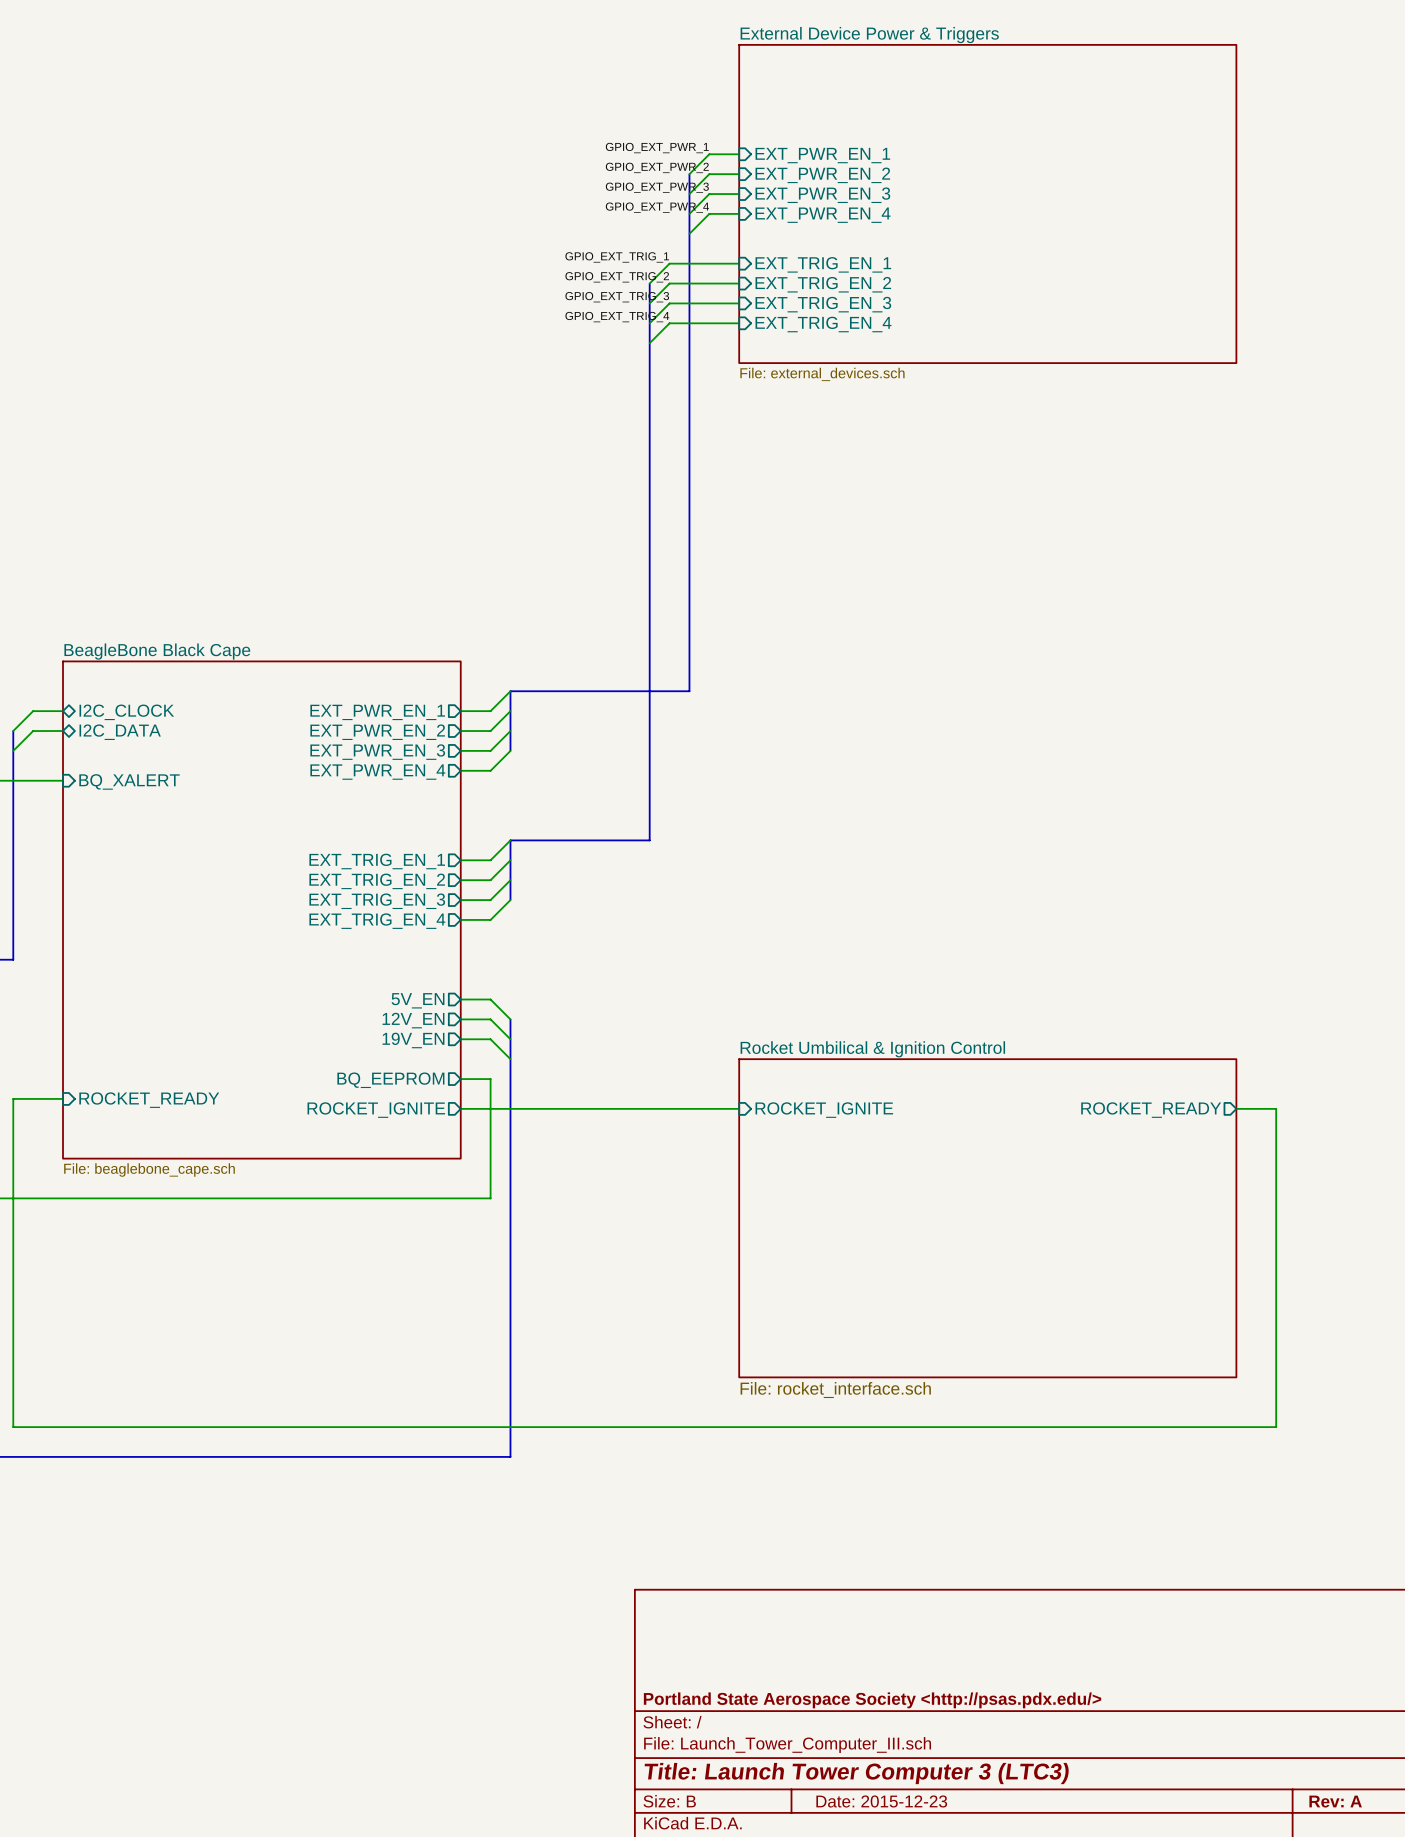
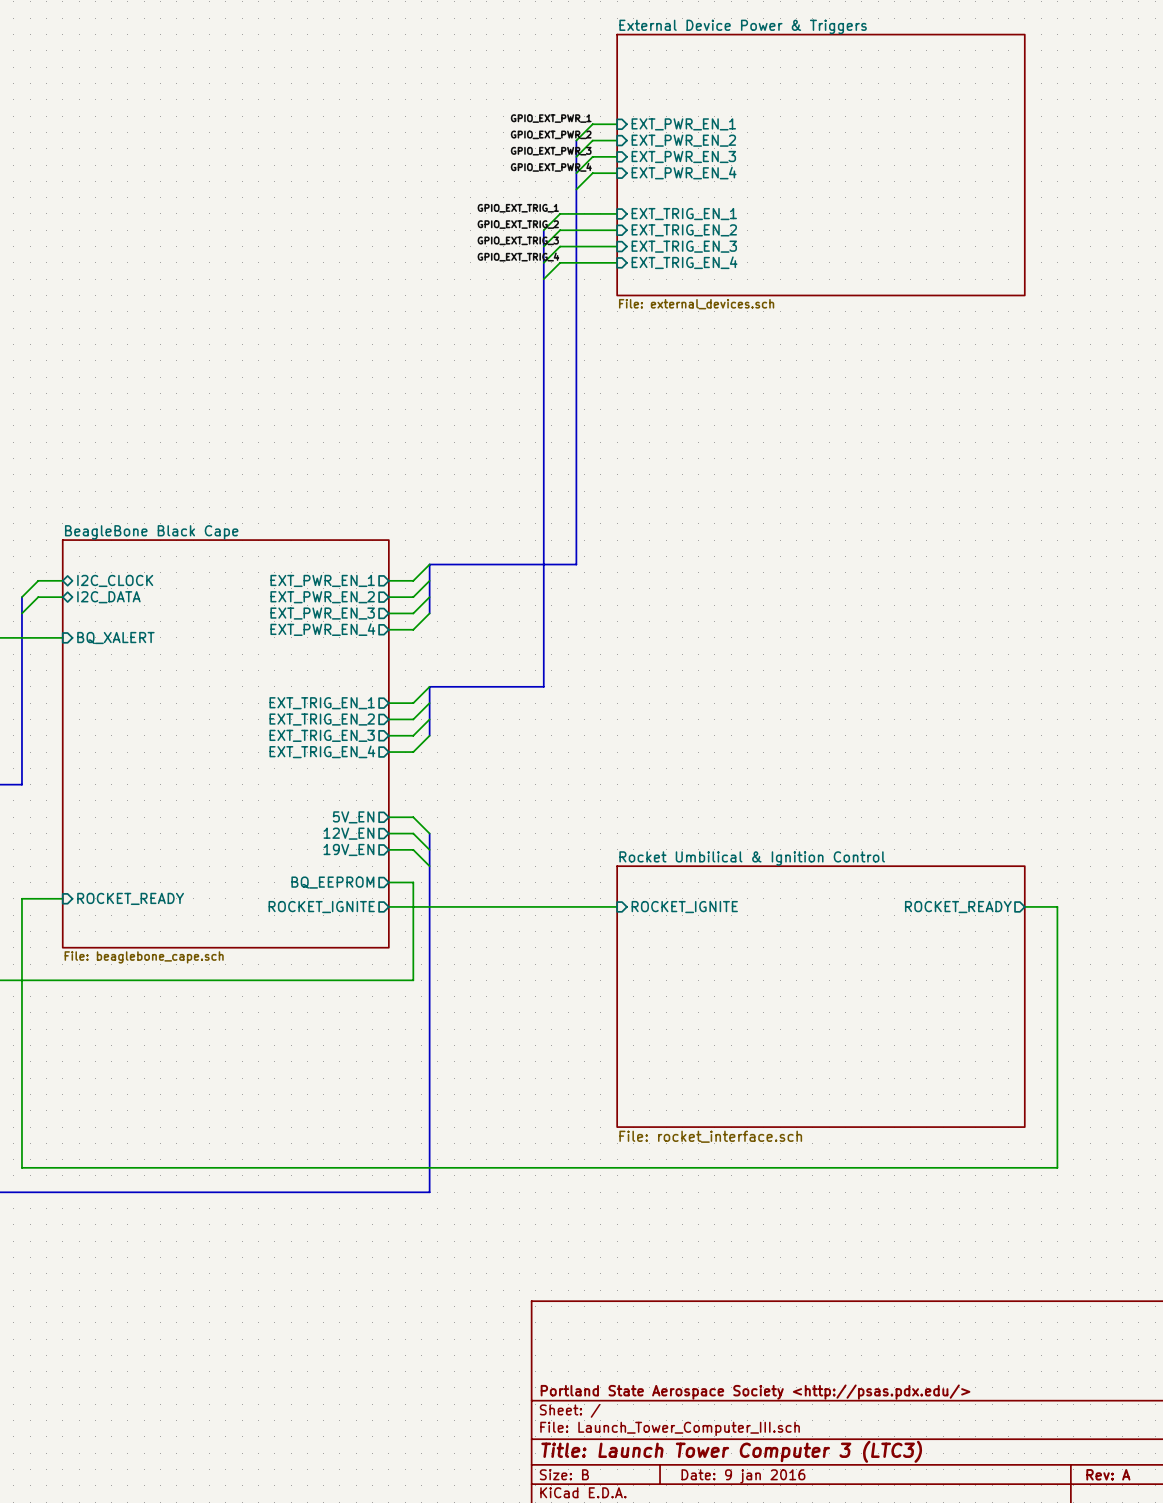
title block: Date: 2015-12-23 (881, 1801) -> Date: 9 jan 2016 (743, 1476)

